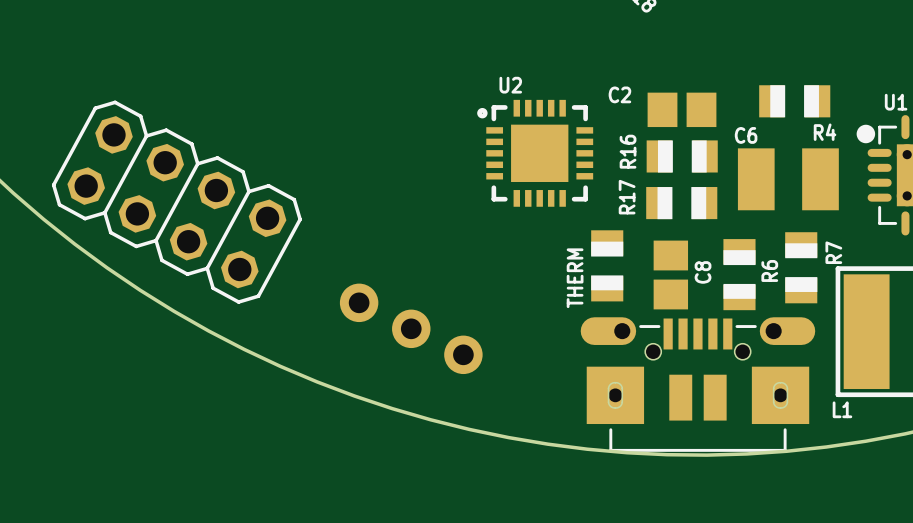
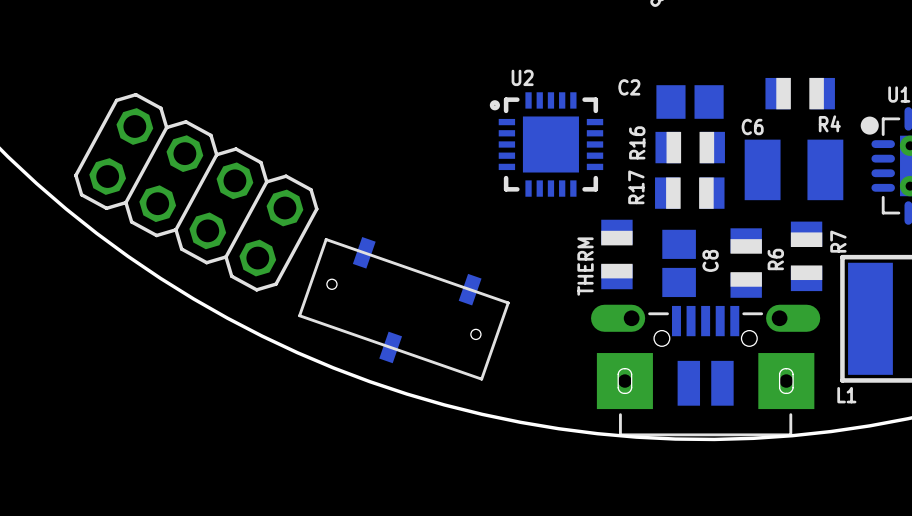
part: none -> (403, 308)
part: (411, 328) -> none

